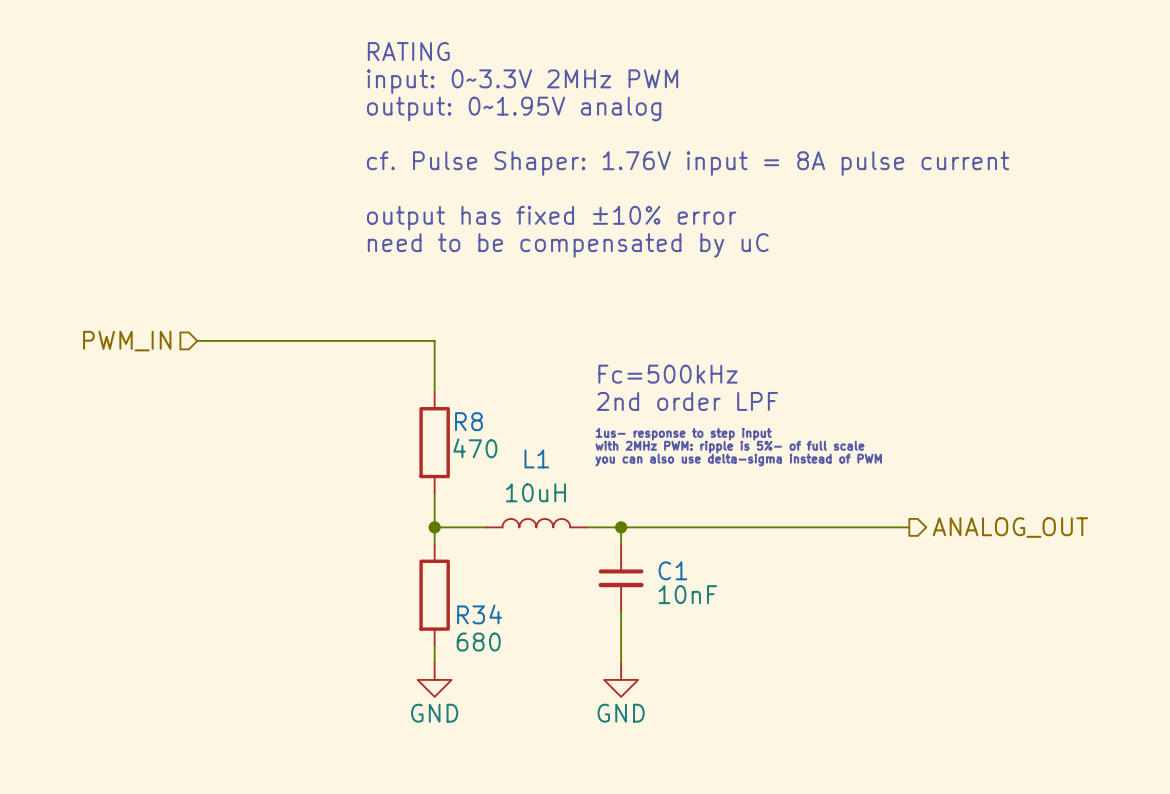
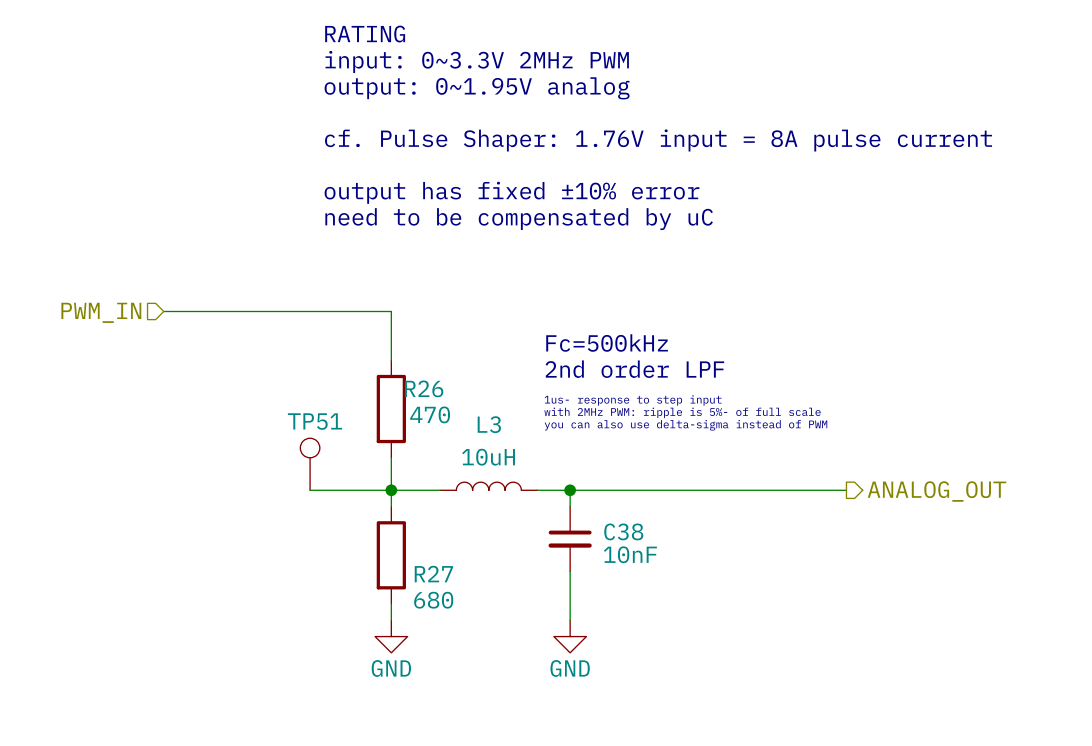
R8 name: R8 (468, 421) -> R26 (424, 388)
L1 name: L1 (536, 458) -> L3 (489, 424)
TP51: none -> (310, 464)
wire: none -> (310, 490) (391, 490)
C1 name: C1 (672, 570) -> C38 (623, 531)
R34 name: R34 (479, 614) -> R27 (433, 574)

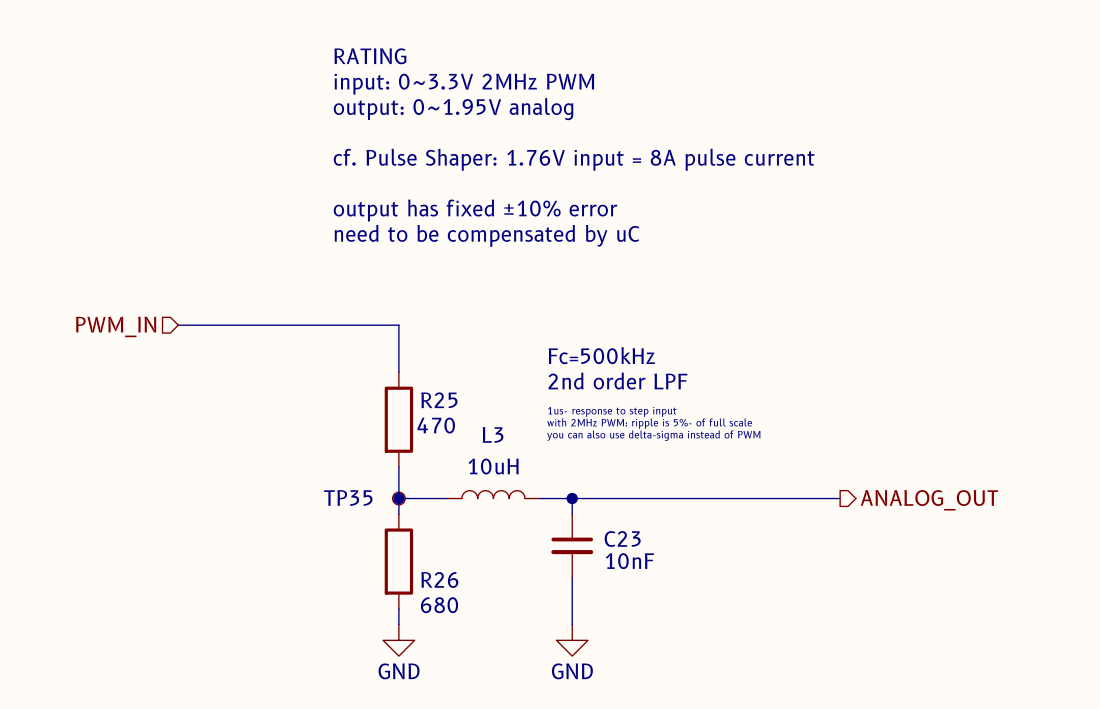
R26 name: R26 (424, 388) -> R25 (439, 400)
TP51: (310, 464) -> none
wire: (310, 490) (391, 490) -> none
TP35: none -> (398, 498)
C38 name: C38 (623, 531) -> C23 (622, 539)
R27 name: R27 (433, 574) -> R26 (439, 579)

